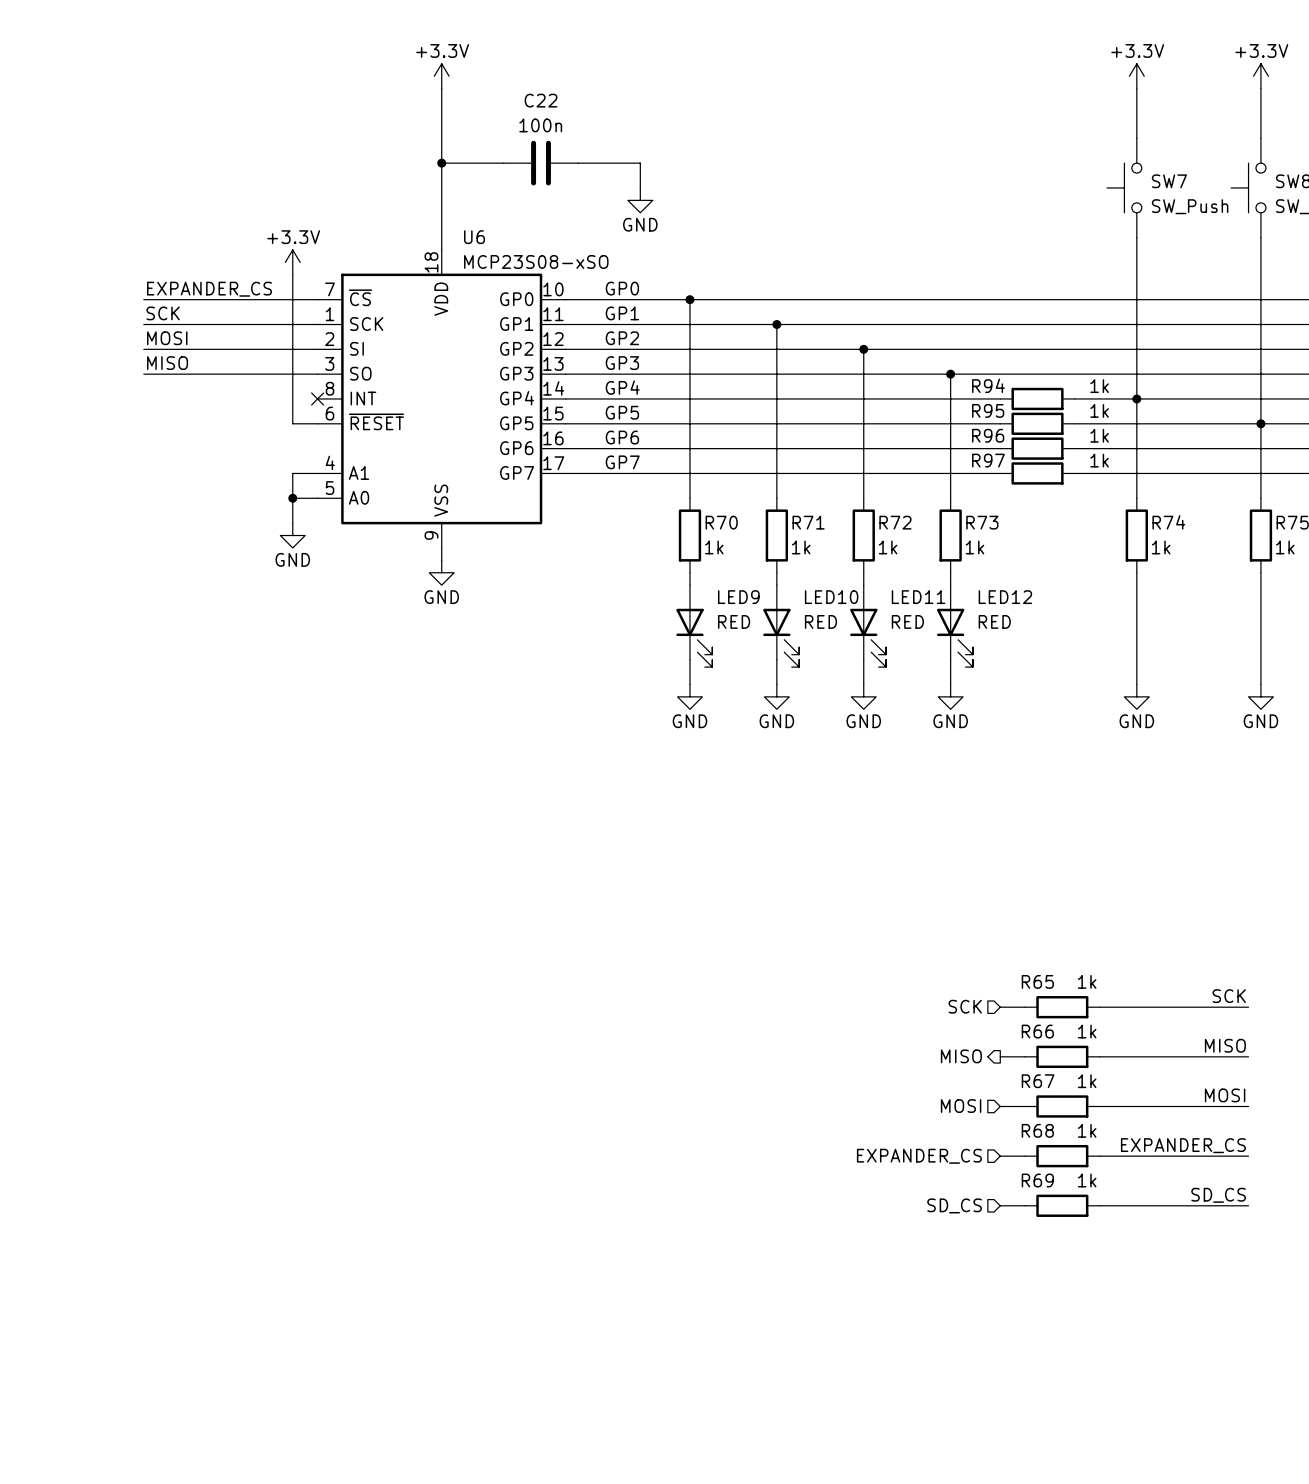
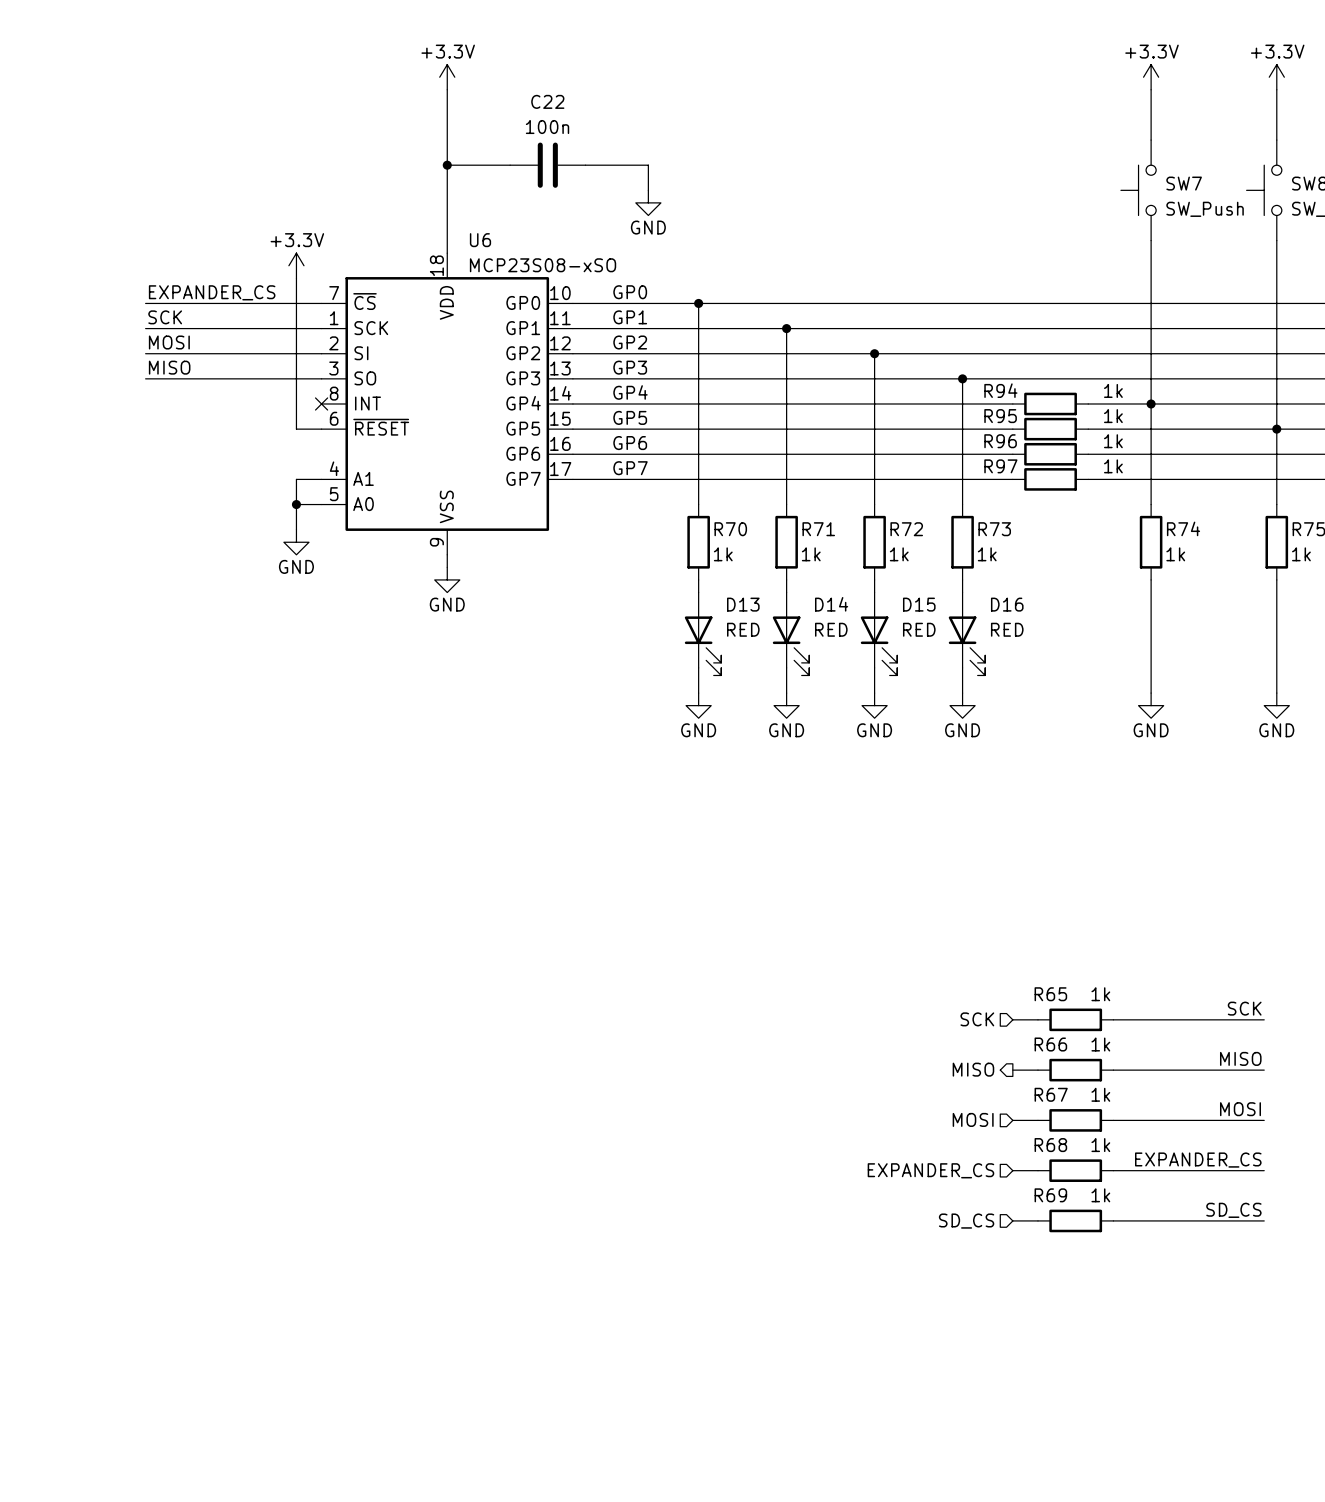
LED9 name: LED9 (738, 597) -> D13 (743, 604)
LED10 name: LED10 (831, 597) -> D14 (831, 604)
LED11 name: LED11 (918, 597) -> D15 (919, 604)
LED12 name: LED12 (1005, 597) -> D16 (1007, 604)

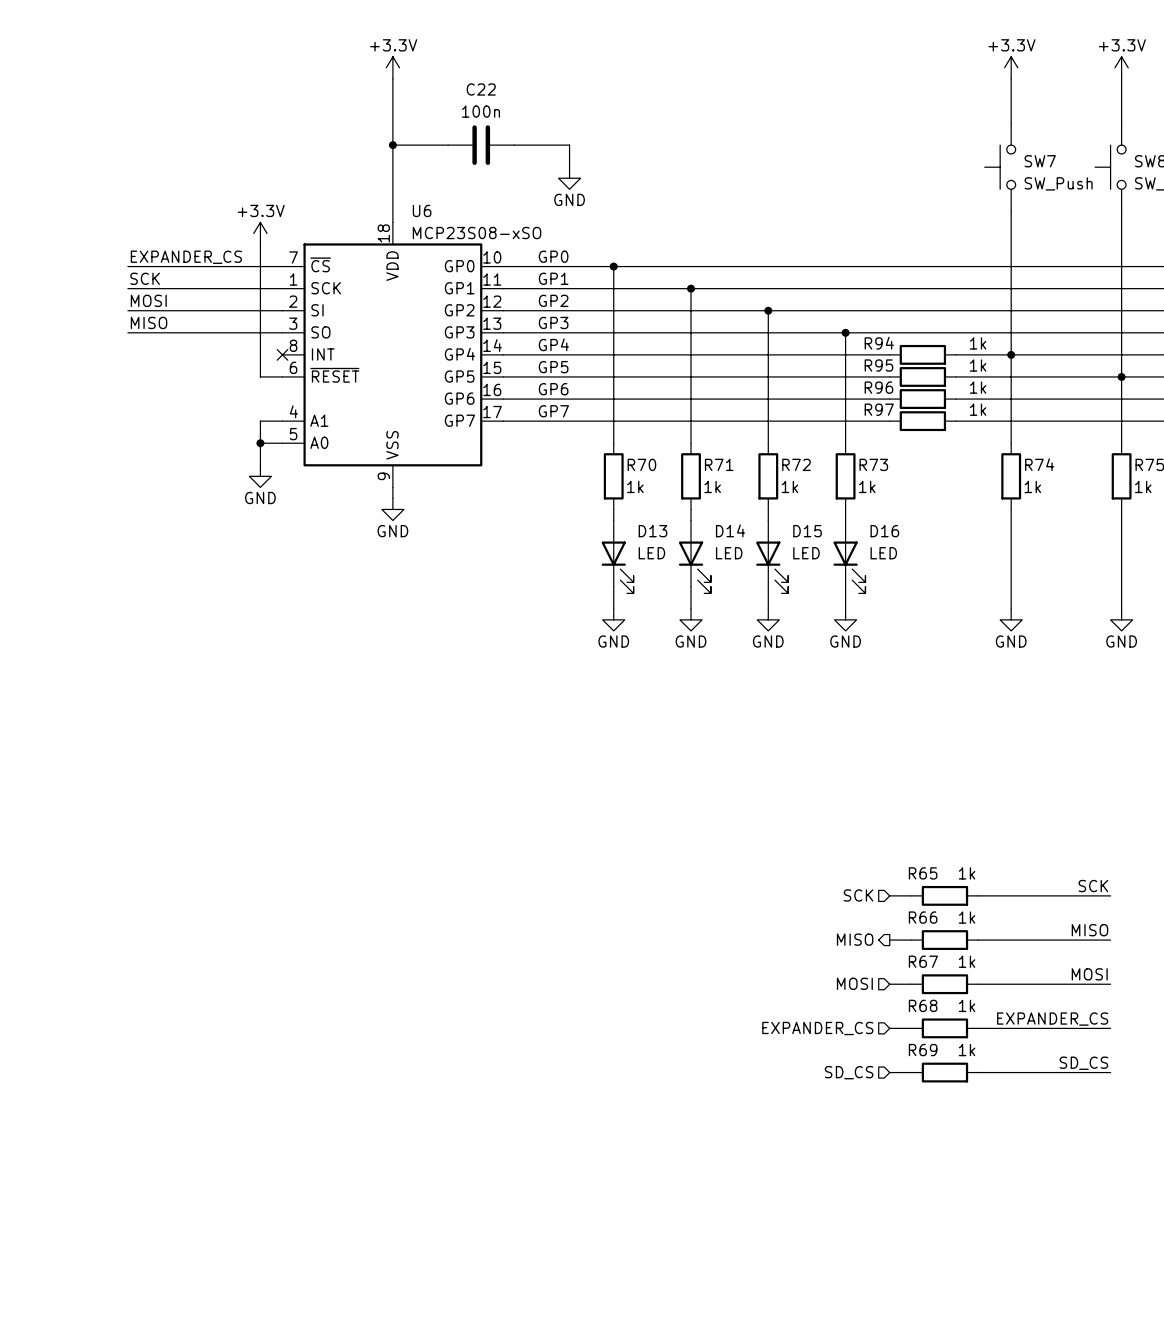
D13 value: RED (743, 629) -> LED (651, 553)
D14 value: RED (831, 629) -> LED (729, 553)
D15 value: RED (919, 629) -> LED (806, 553)
D16 value: RED (1007, 629) -> LED (883, 553)

